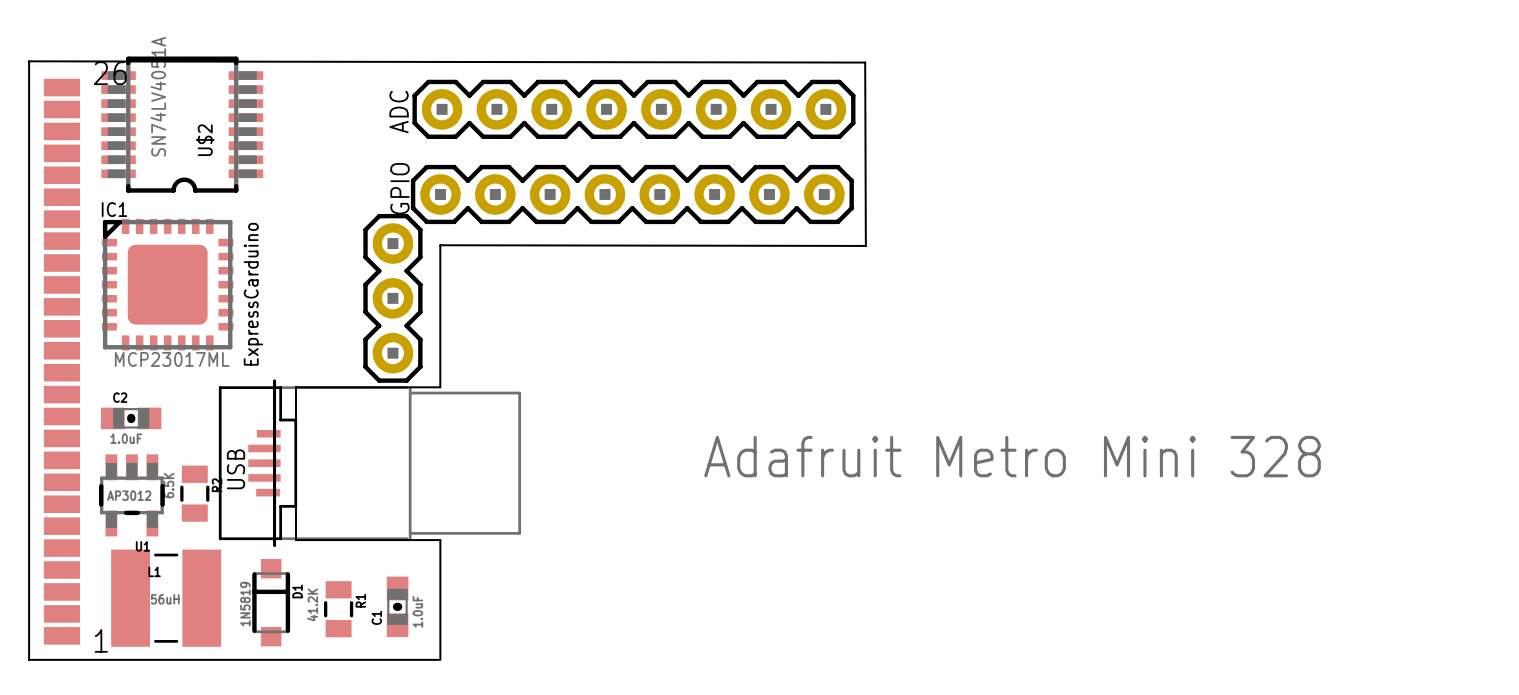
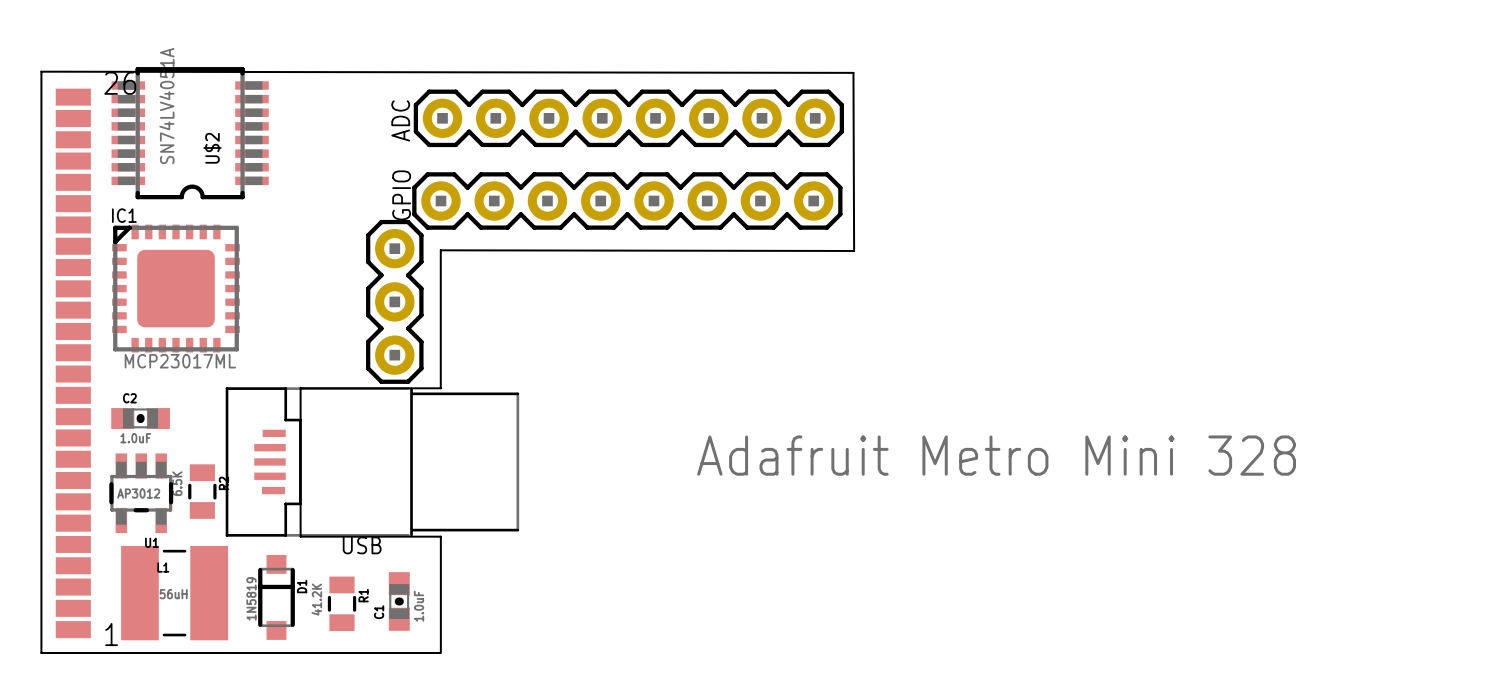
text: ExpressCarduino (253, 294) -> none
USB footprint: [218, 379, 522, 547] -> [225, 387, 520, 537]
USB name position: USB (236, 469) -> USB (362, 545)

